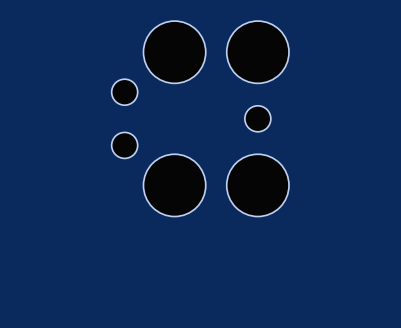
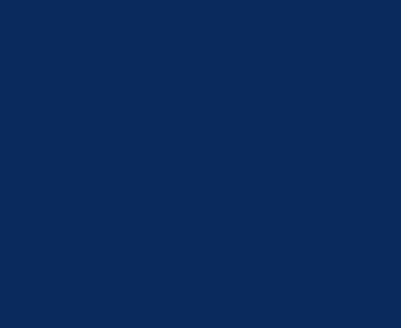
part: (200, 118) -> none

